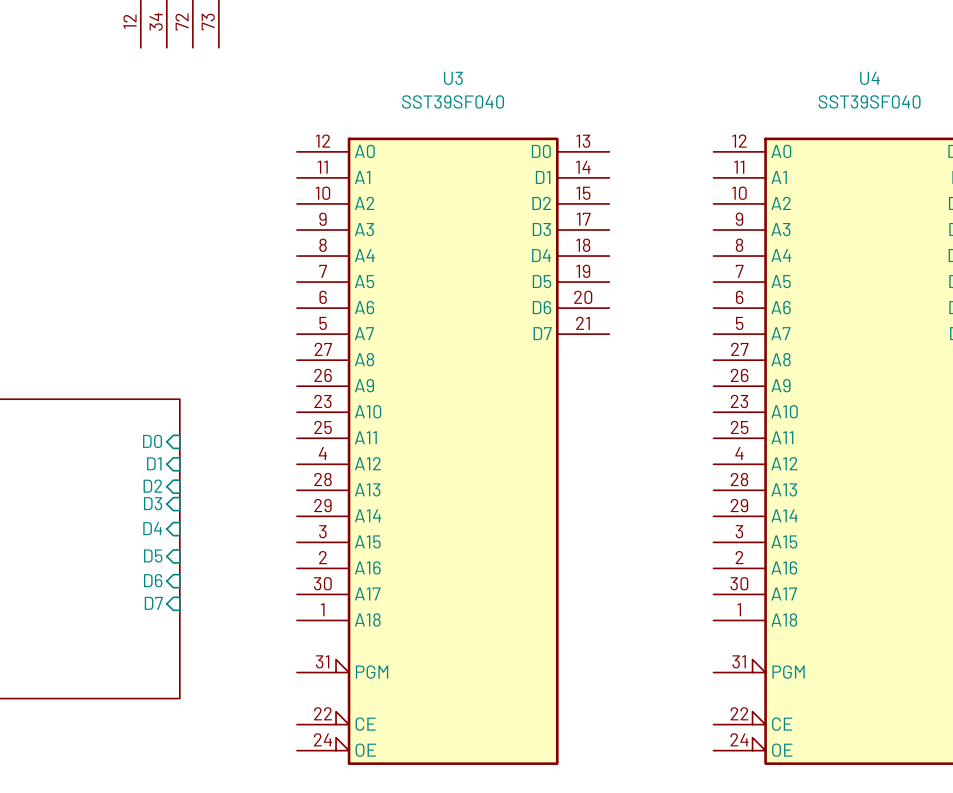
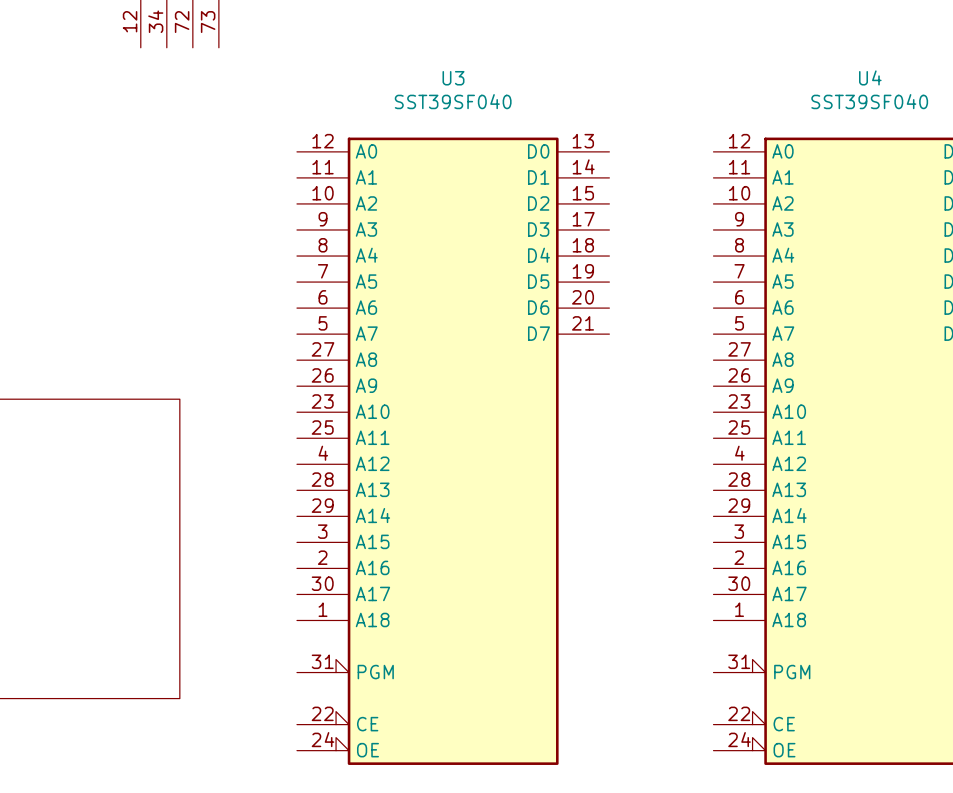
sheet pin: D0 (152, 441) -> none
sheet pin: D1 (154, 463) -> none
sheet pin: D2 (152, 486) -> none
sheet pin: D3 (153, 503) -> none
sheet pin: D4 (152, 528) -> none
sheet pin: D5 (153, 556) -> none
sheet pin: D6 (153, 580) -> none
sheet pin: D7 (153, 603) -> none

